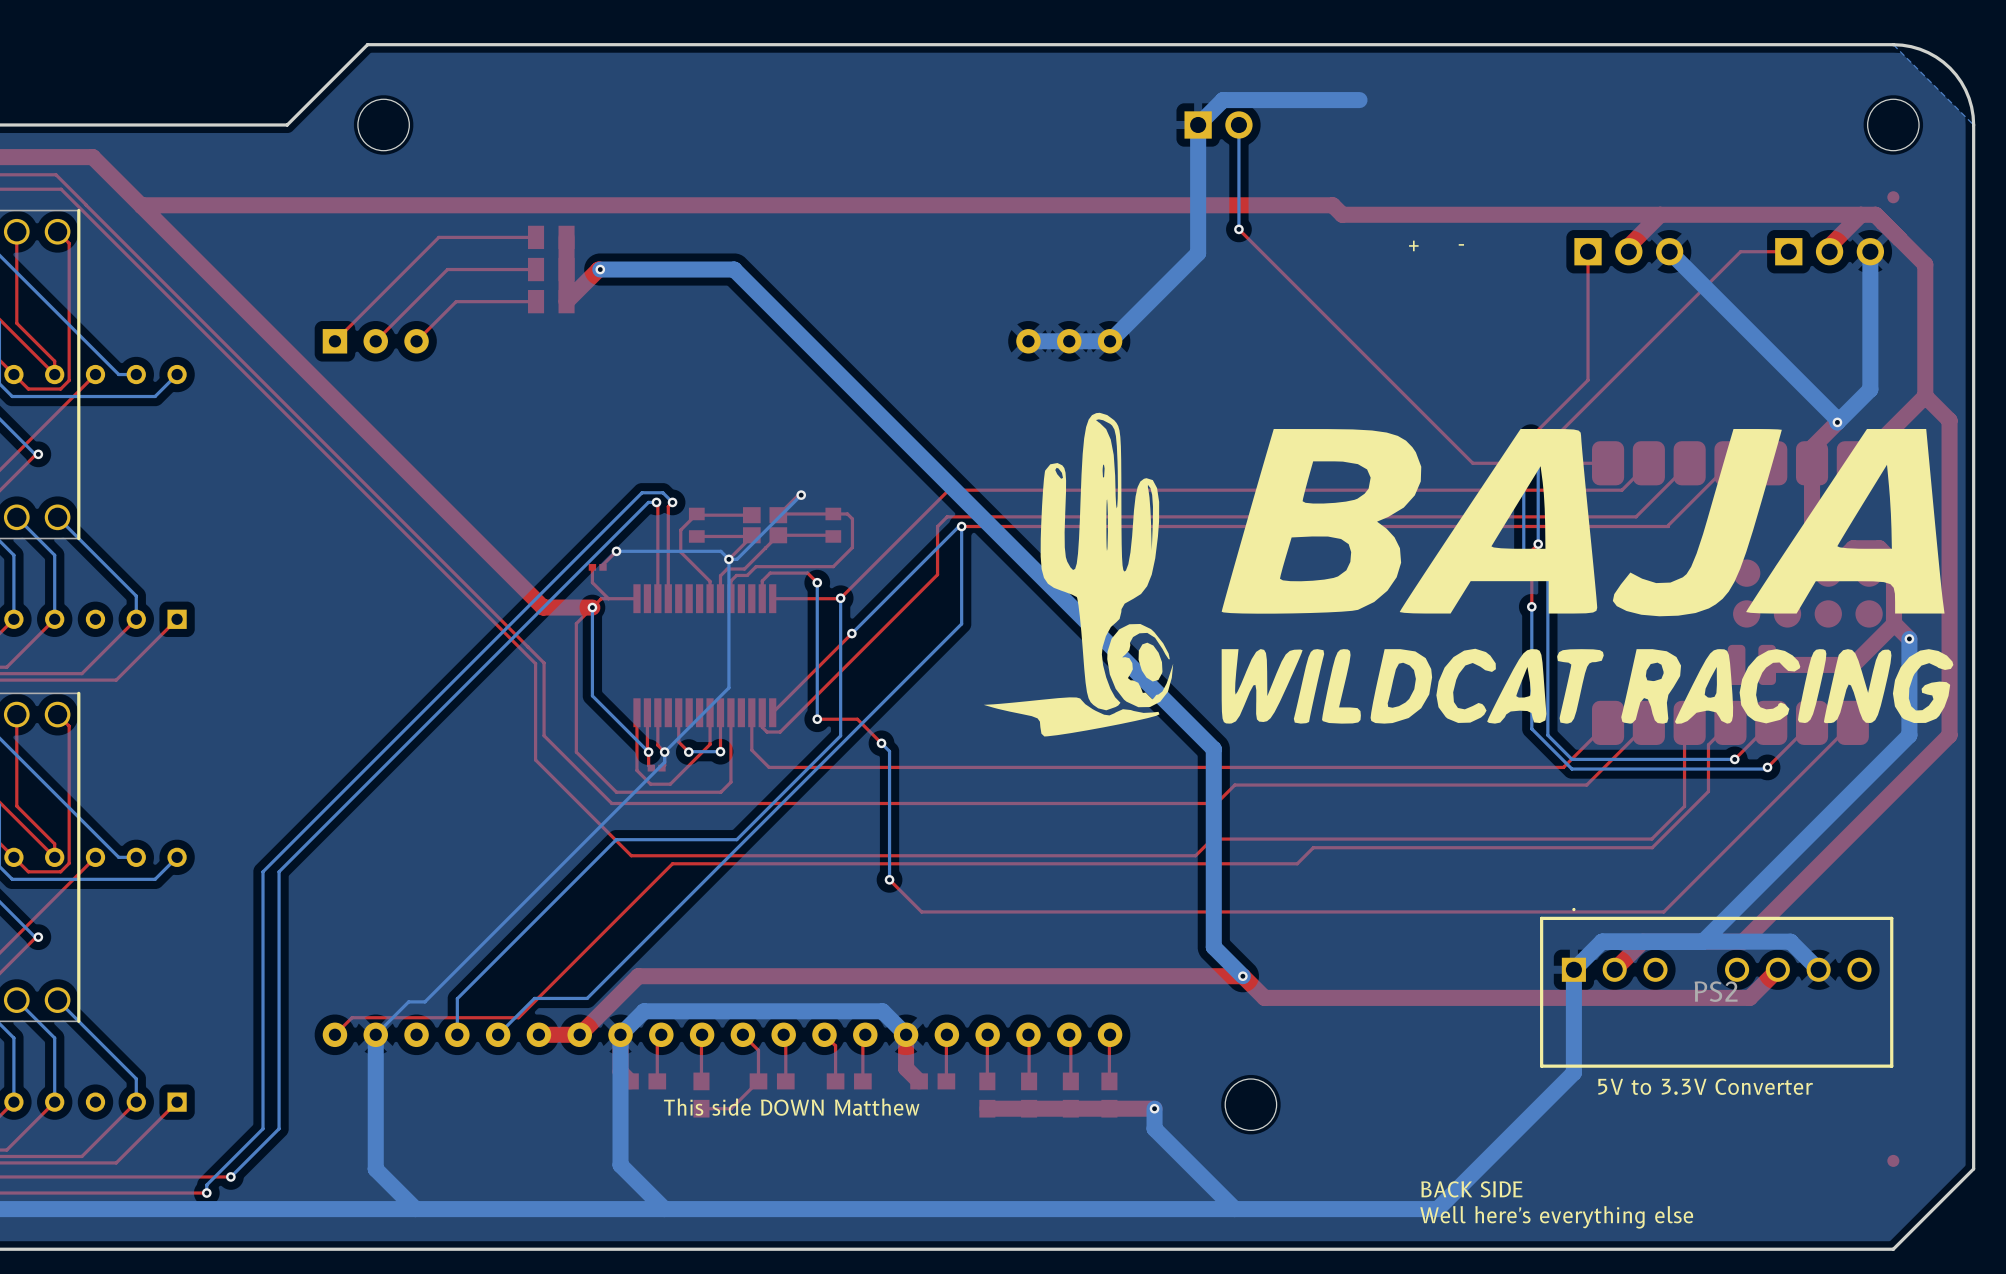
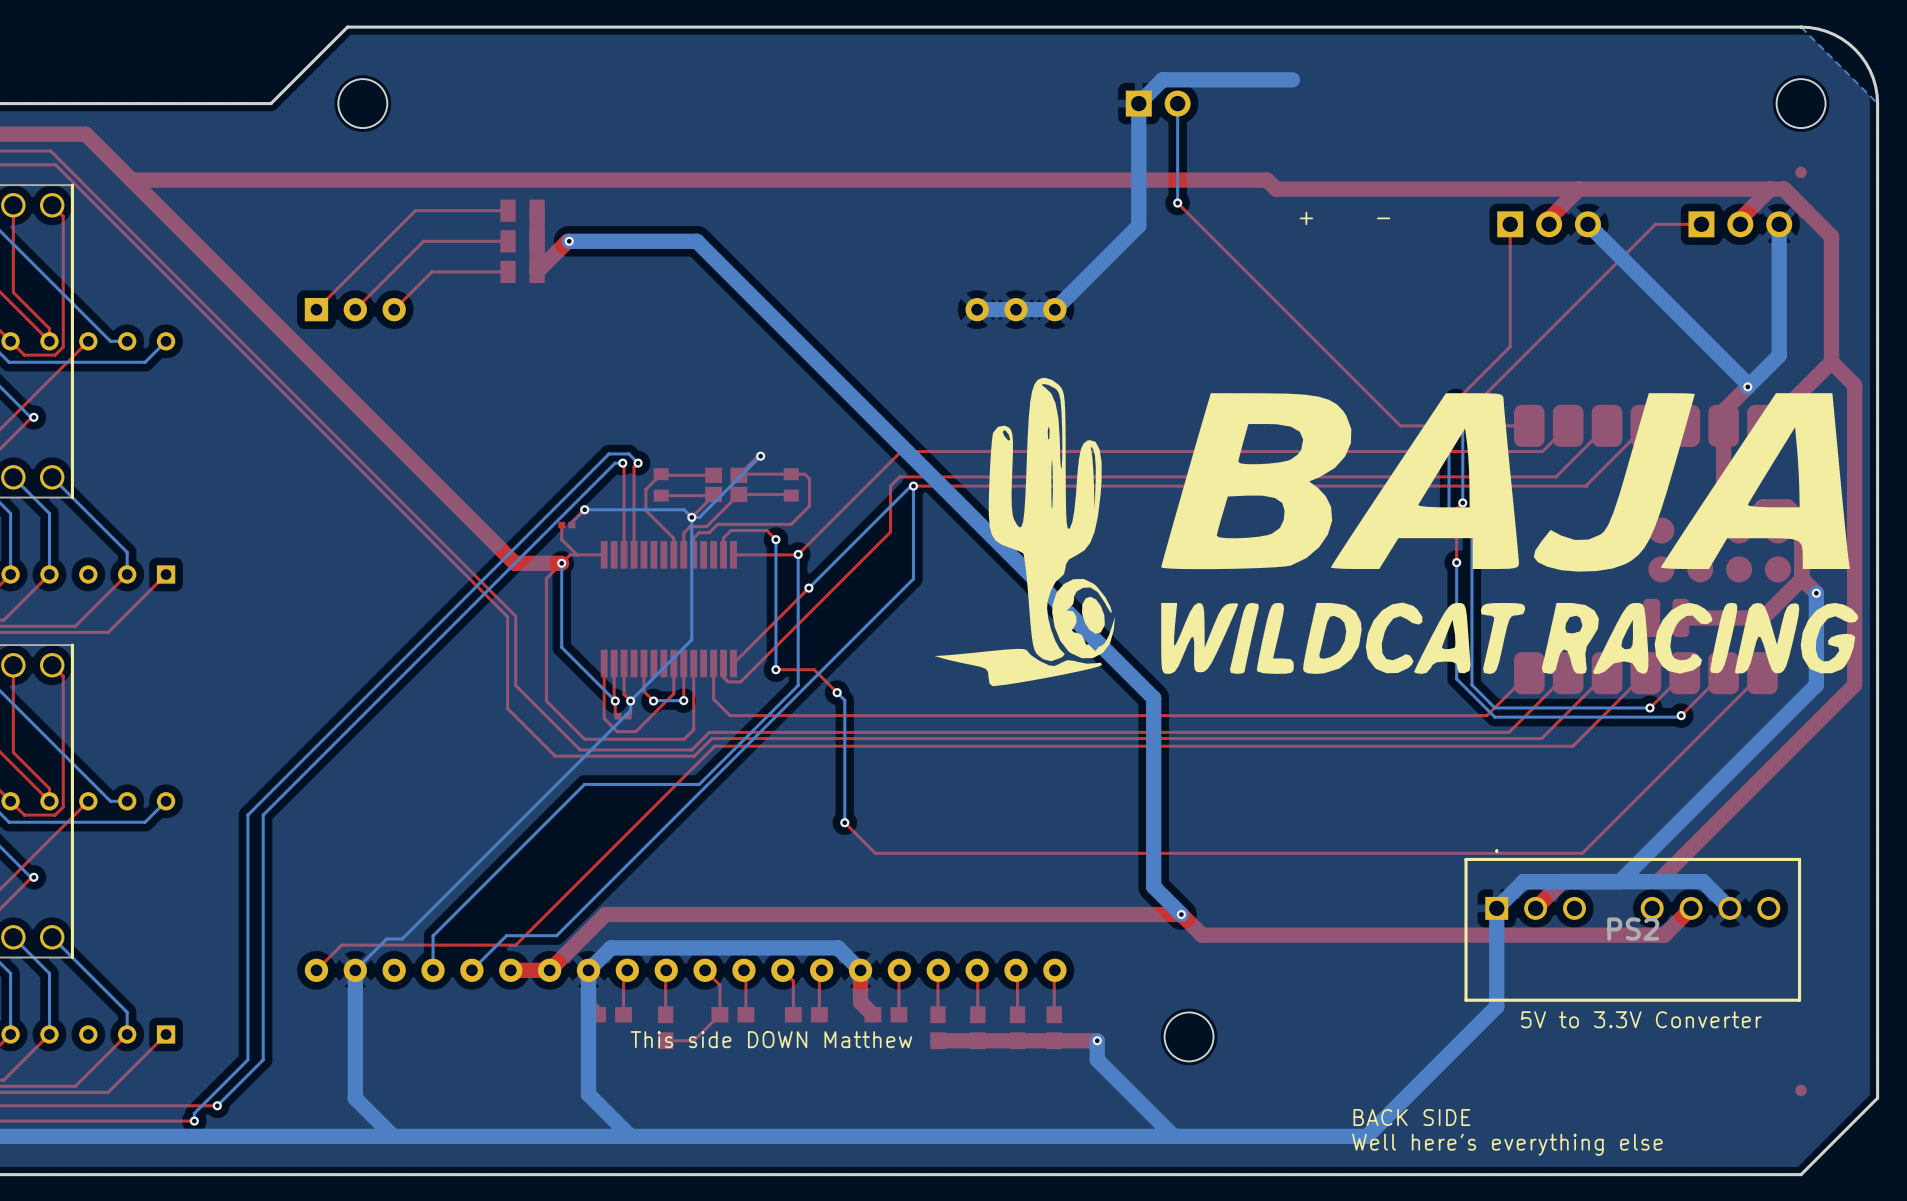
top track: (1684, 728) (1684, 806) (1651, 839) (1212, 839) (1195, 855) (631, 855) (585, 809) -> (1607, 673) (1541, 738) (711, 738) (694, 756) (555, 756)
top track: (1708, 744) (1708, 791) (1652, 847) (1313, 847) (1297, 863) (672, 863) (518, 1017) (352, 1017) -> (1624, 694) (1572, 746) (714, 746) (515, 945) (341, 945) (332, 954)
top track: (1234, 785) (1216, 803) (728, 803) -> (1173, 732) (709, 732) (691, 749)

